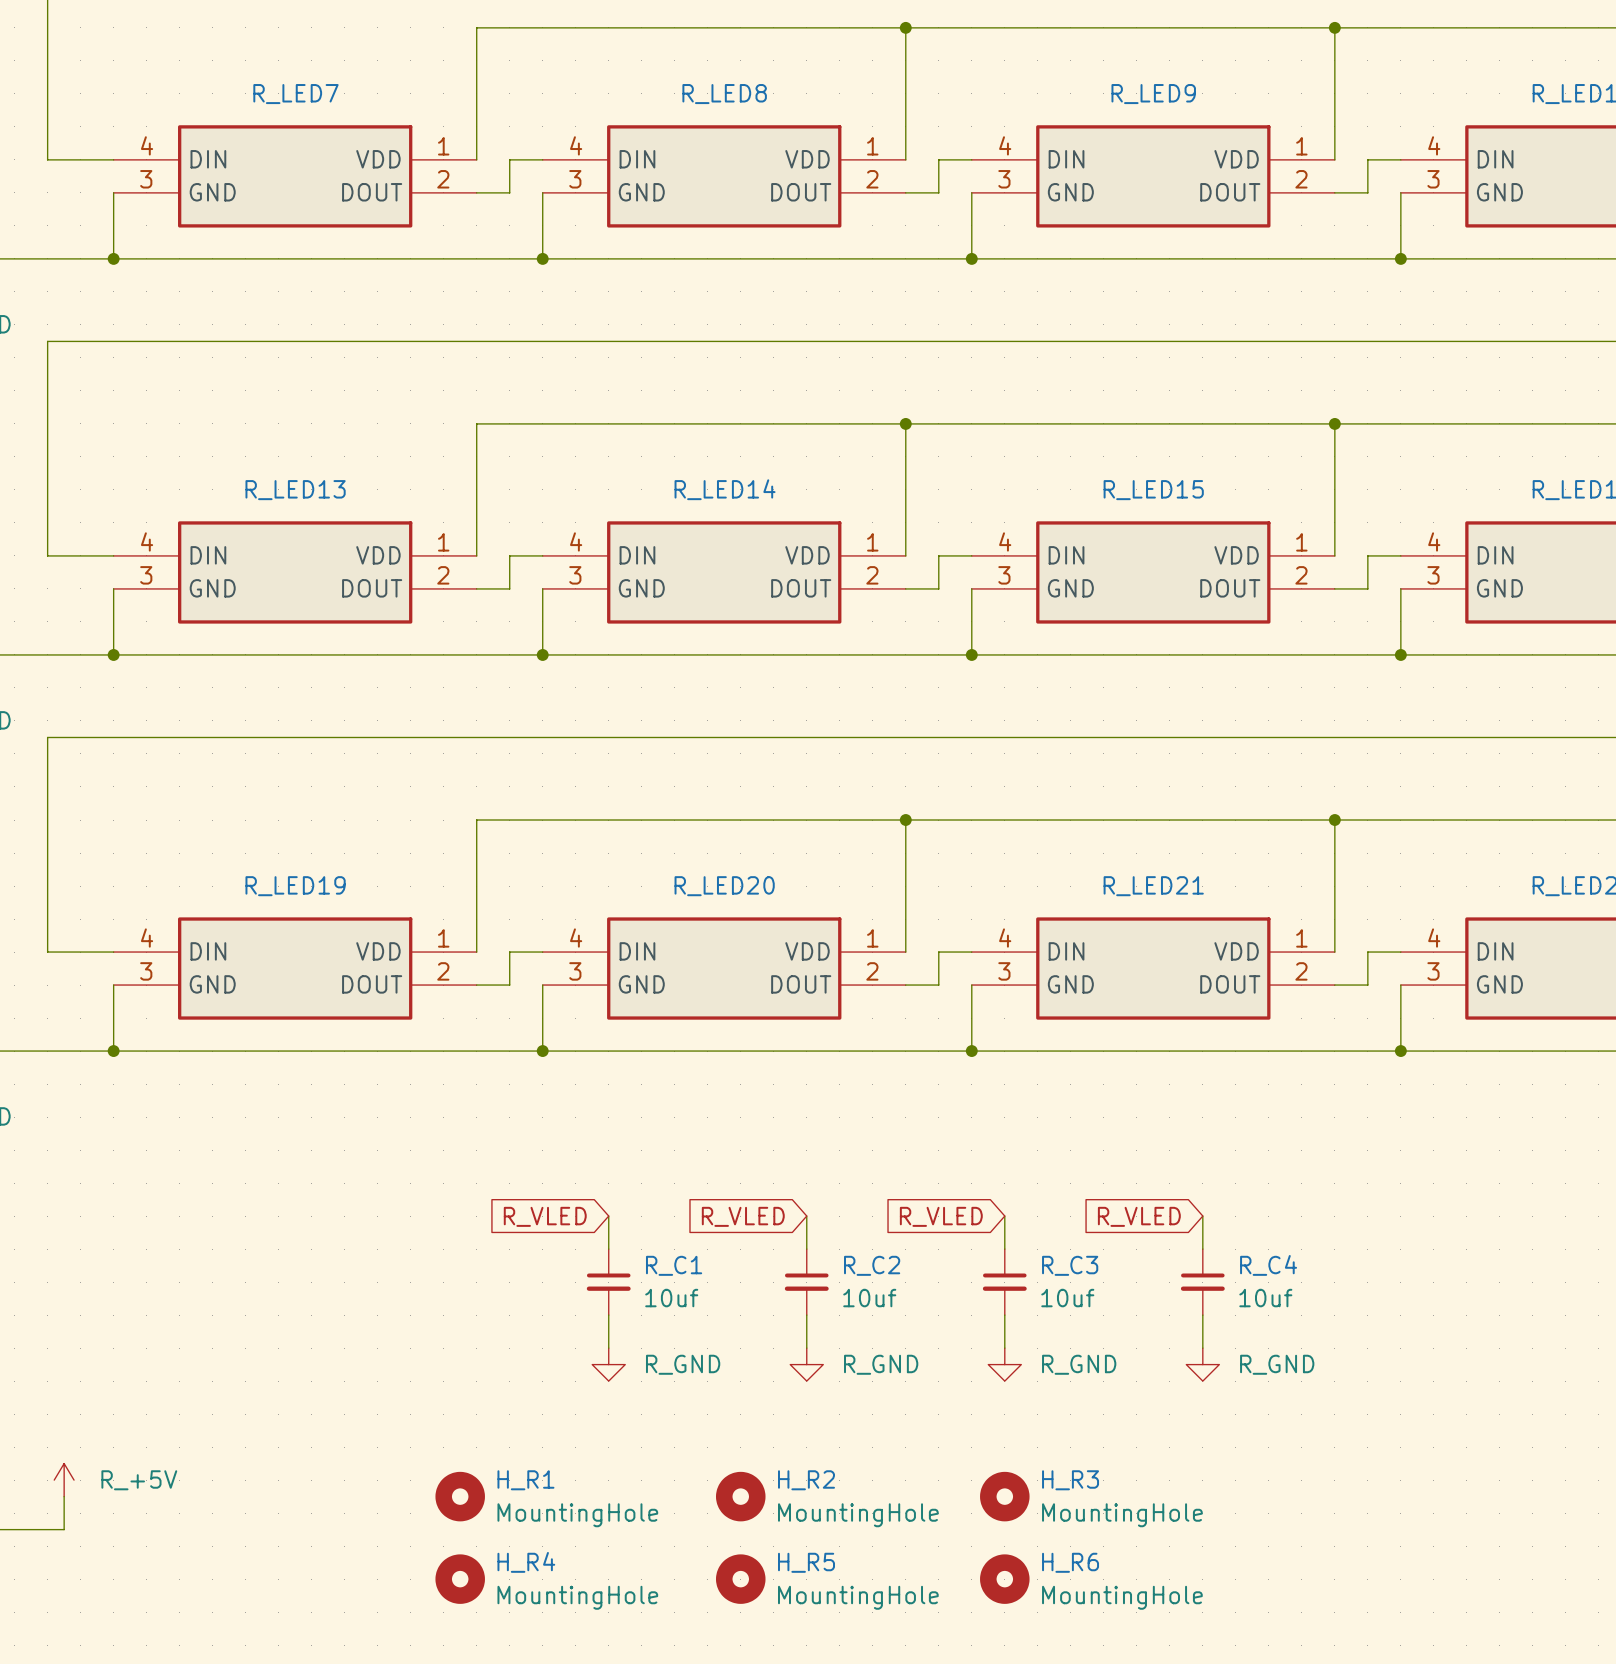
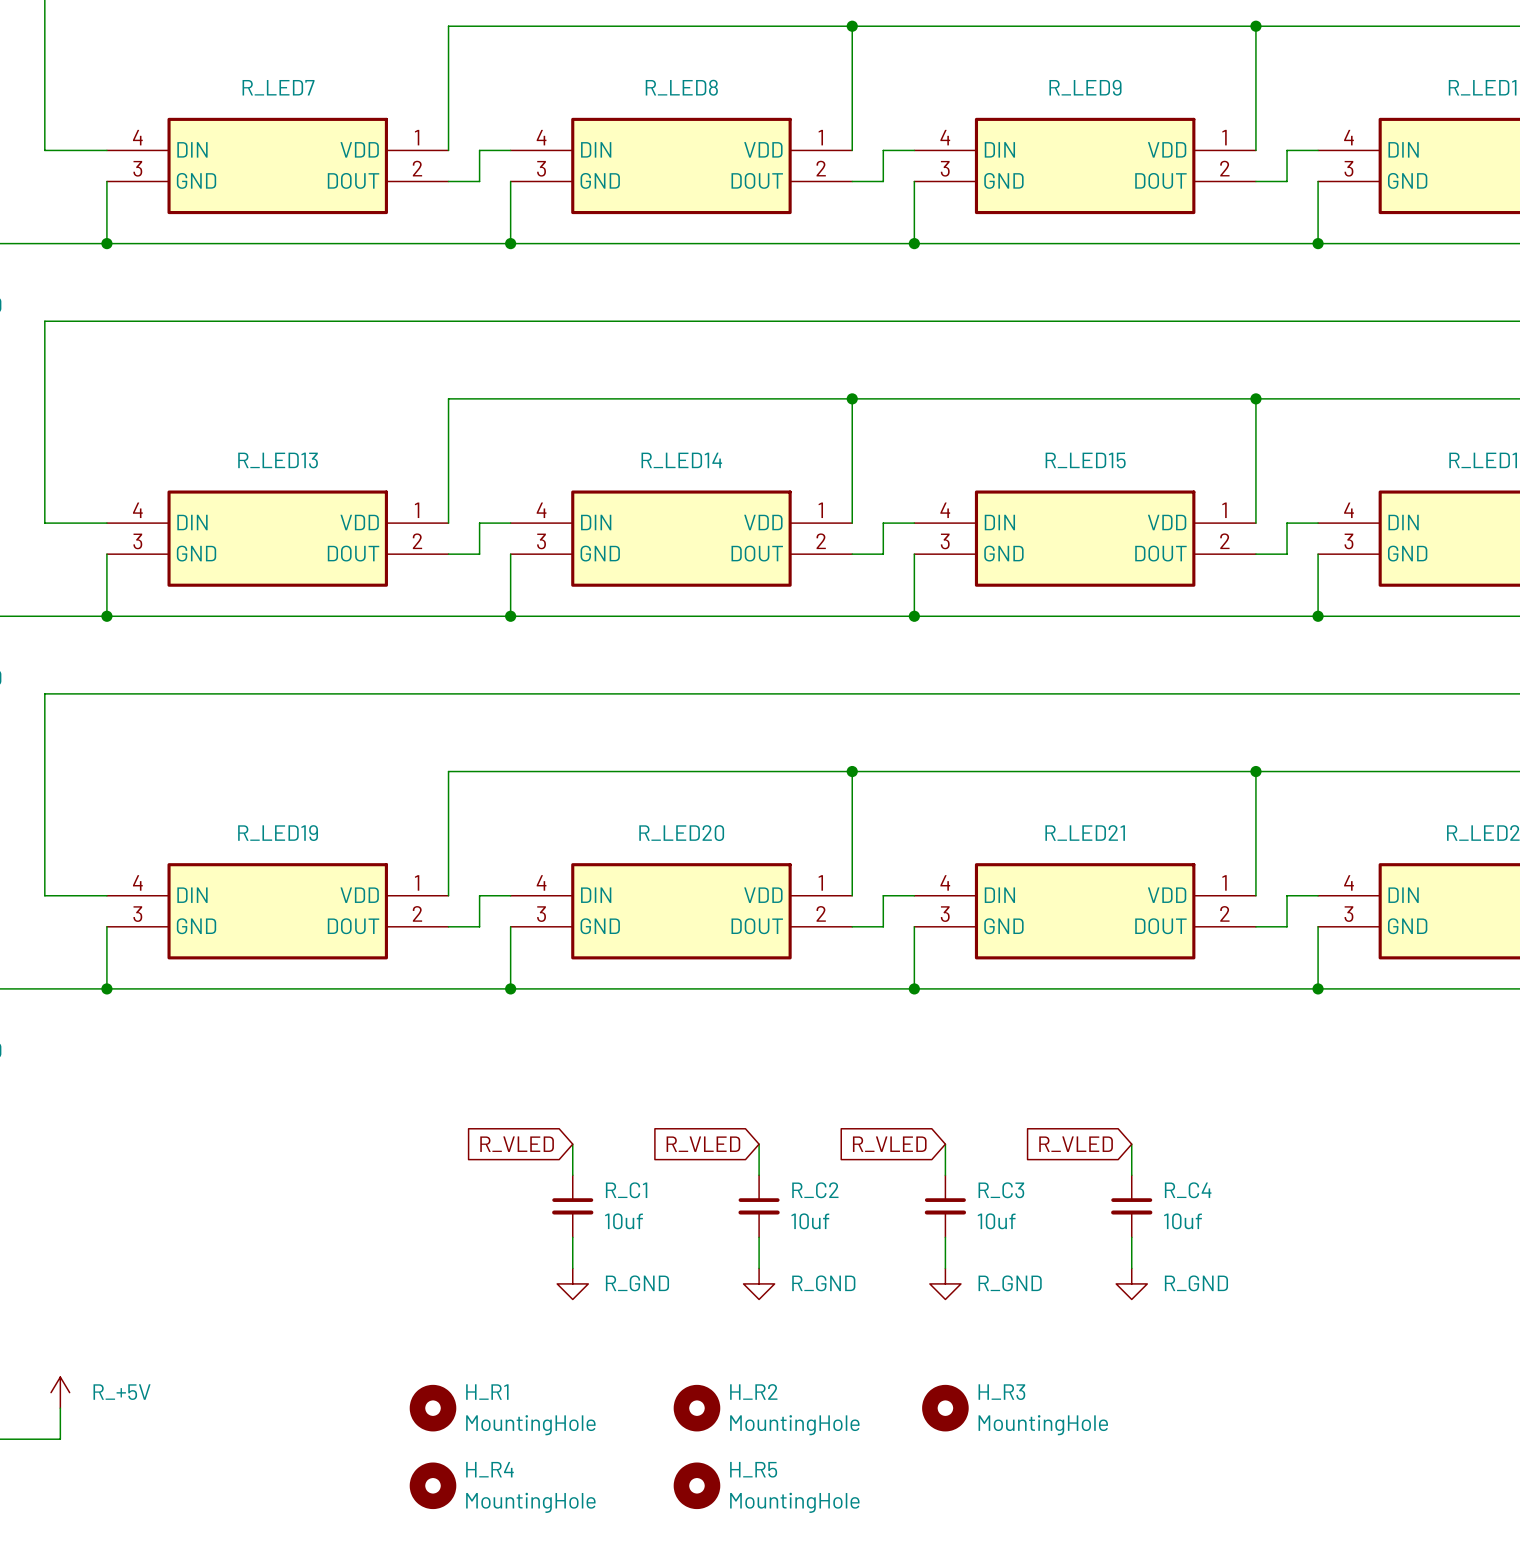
H_R6: MountingHole (1004, 1579) -> none

